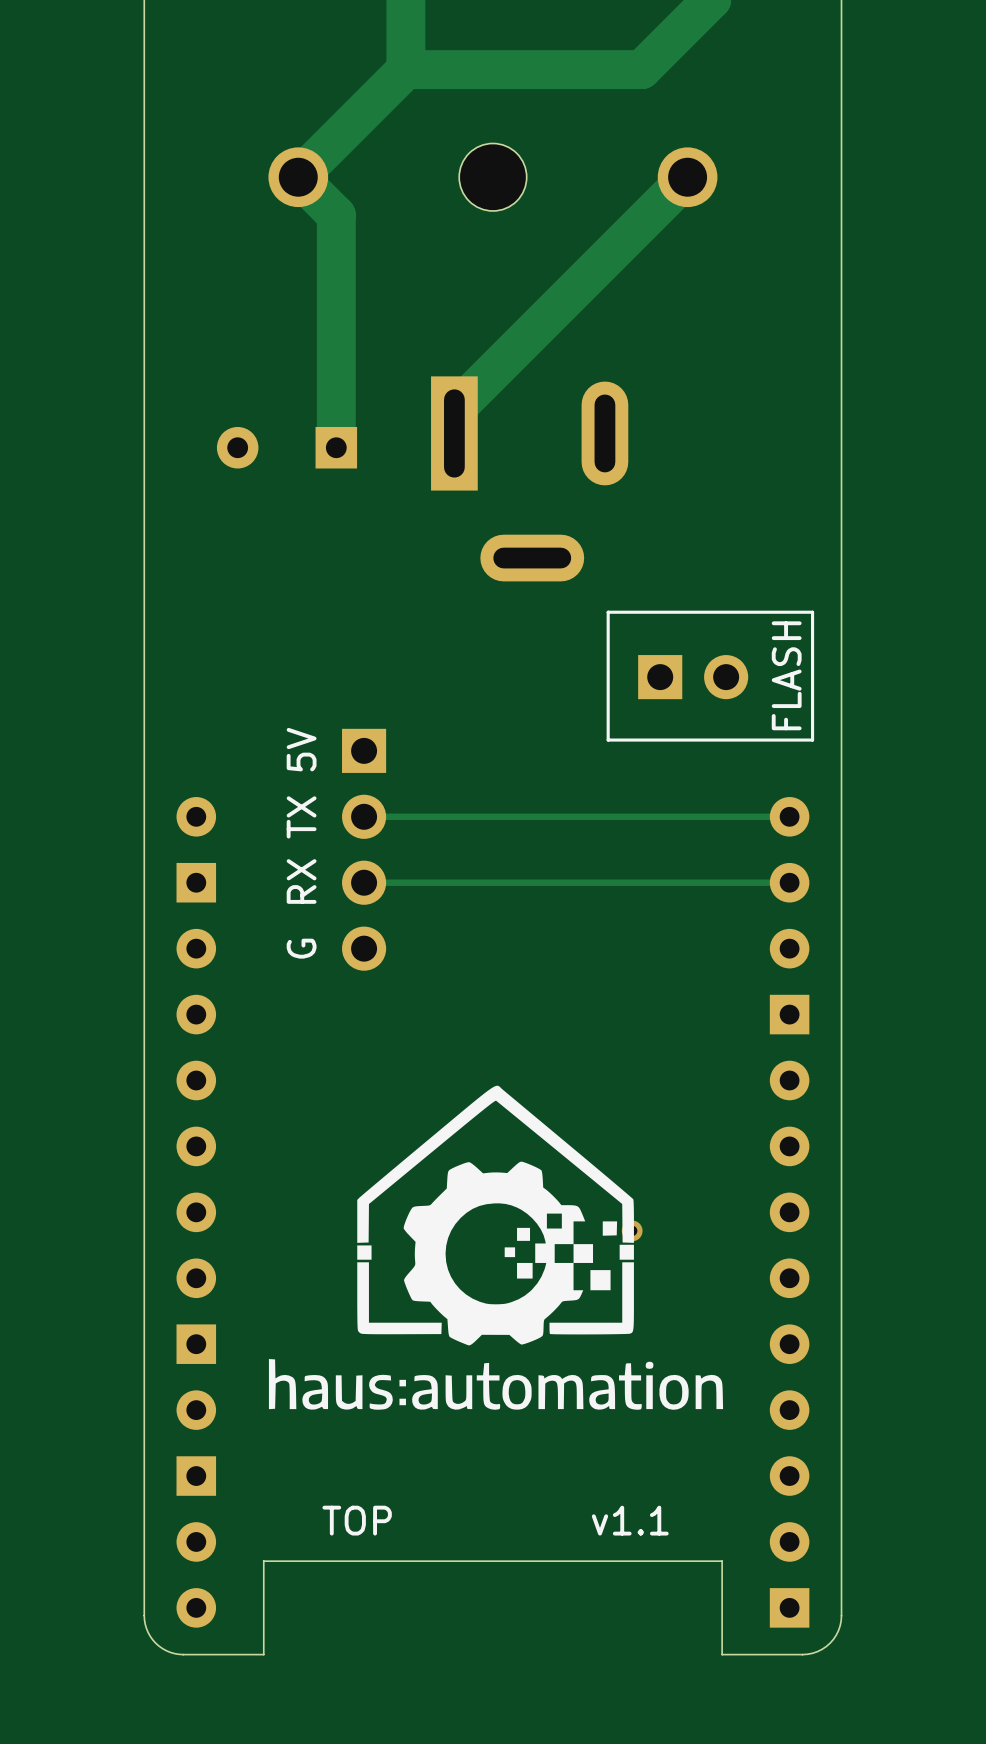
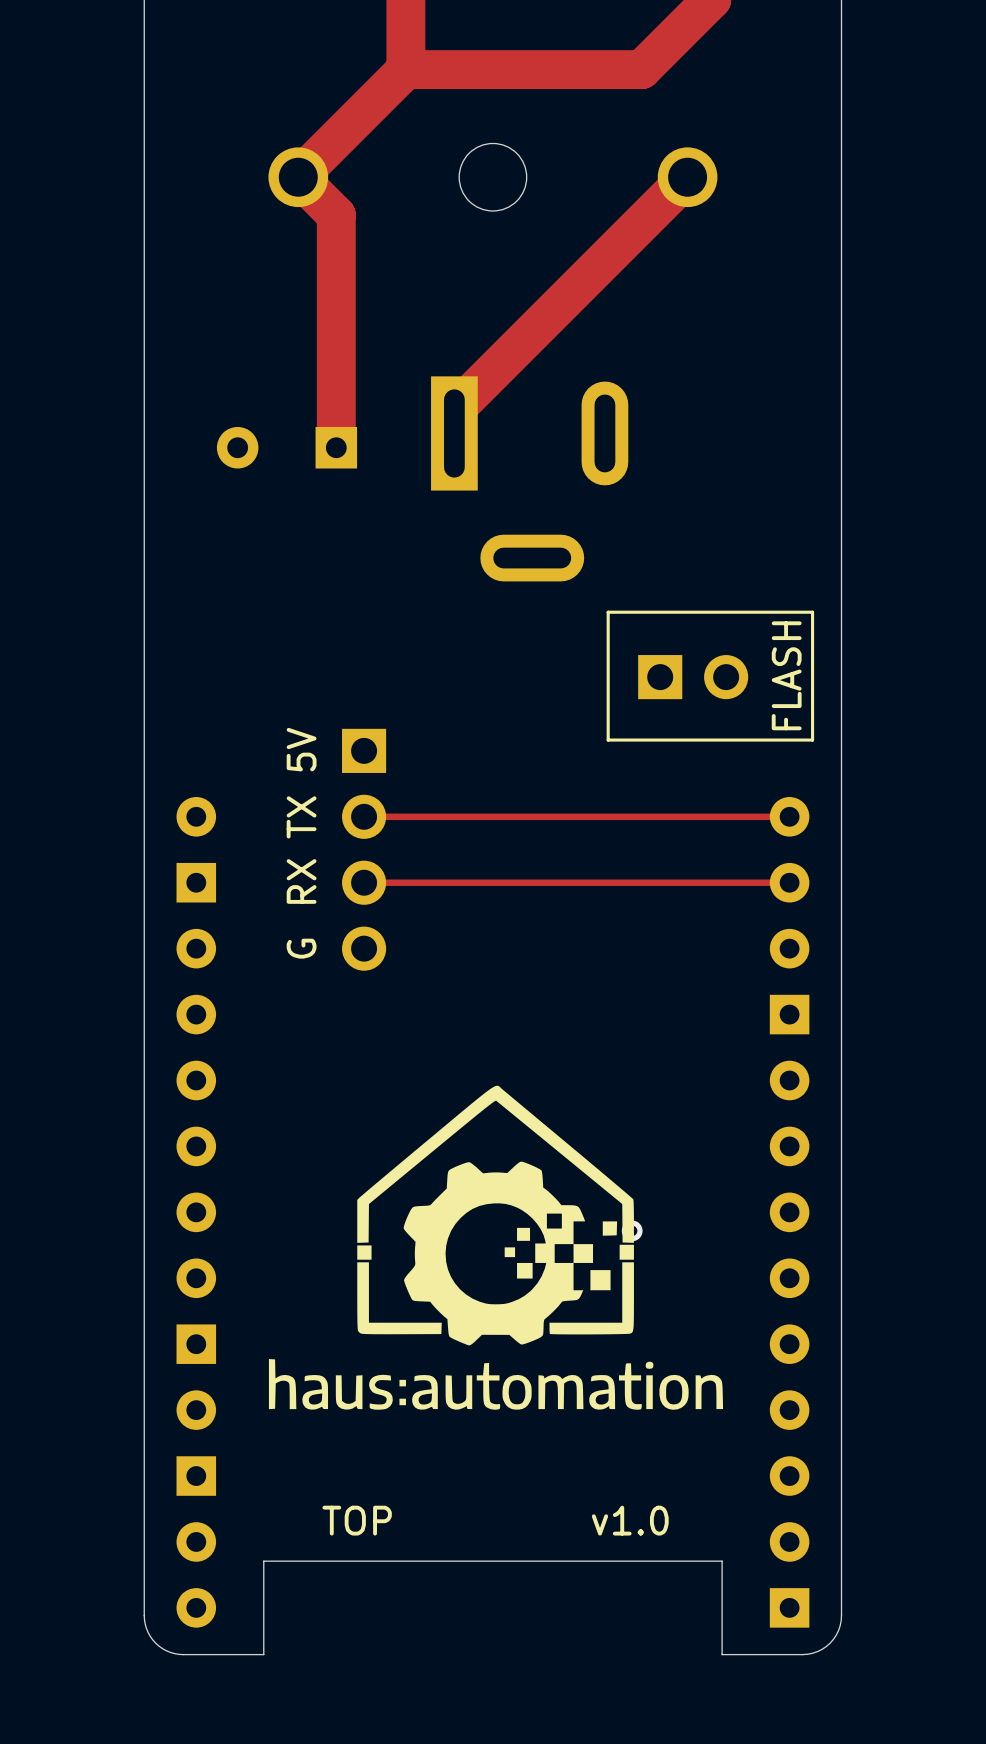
text: v1.1 (630, 1520) -> v1.0 (630, 1520)

